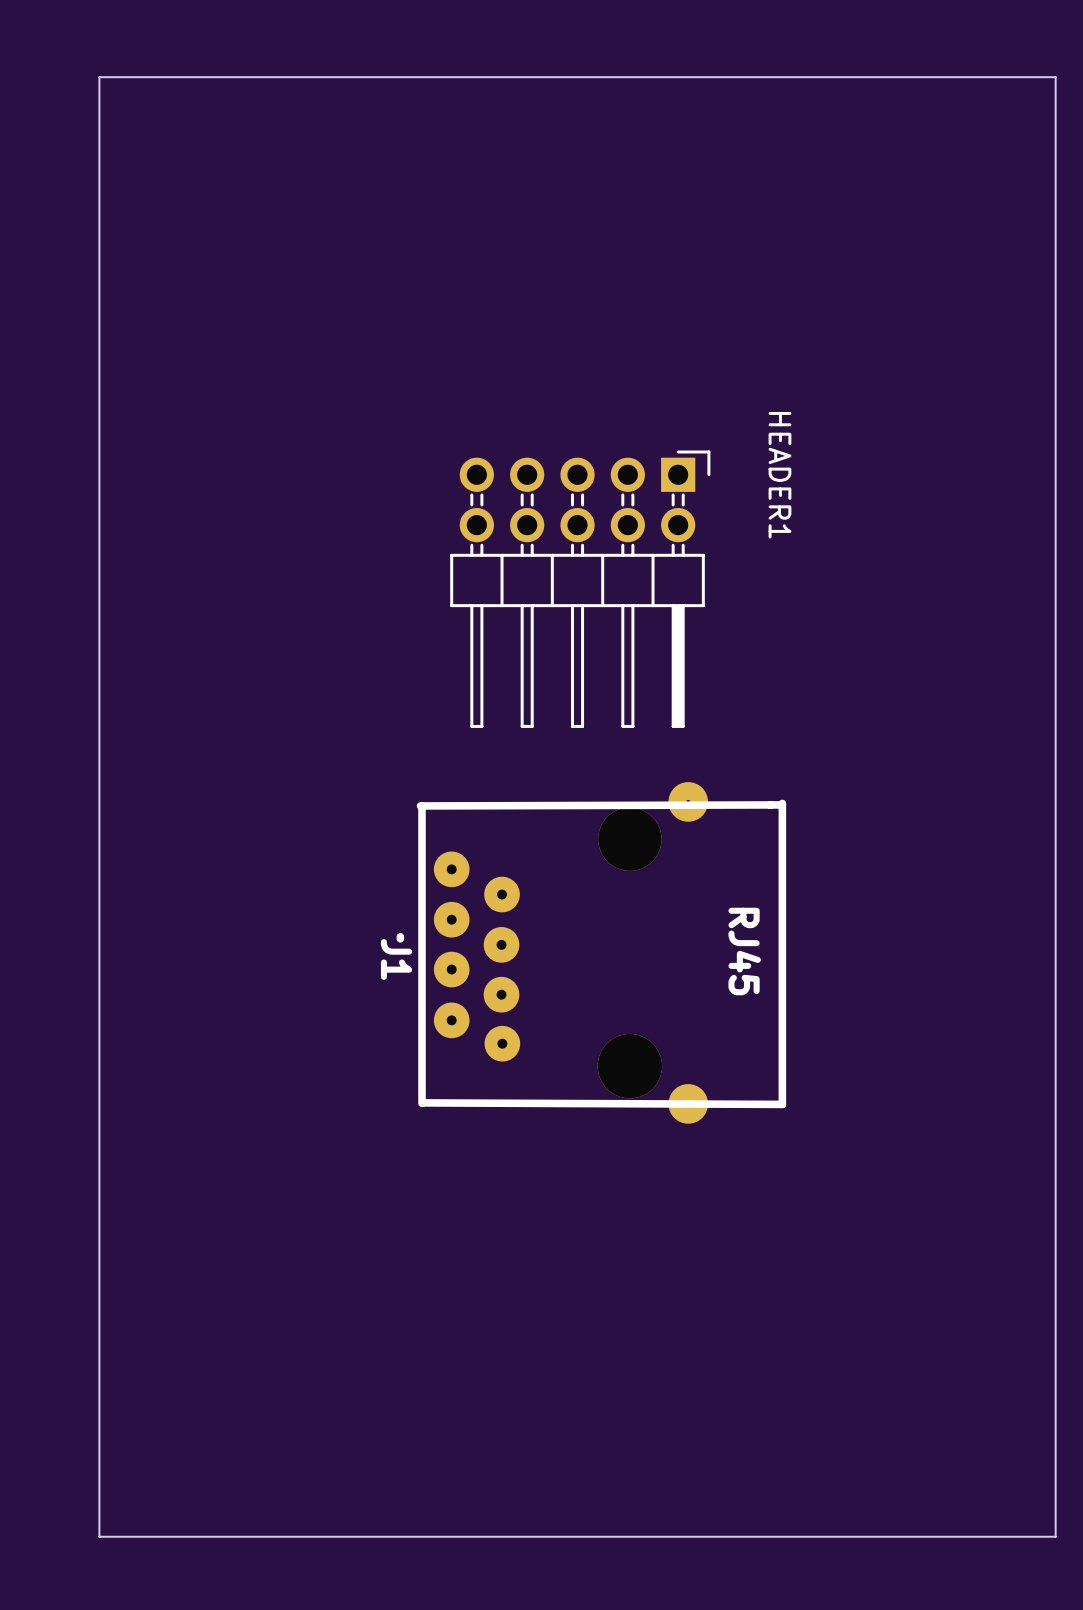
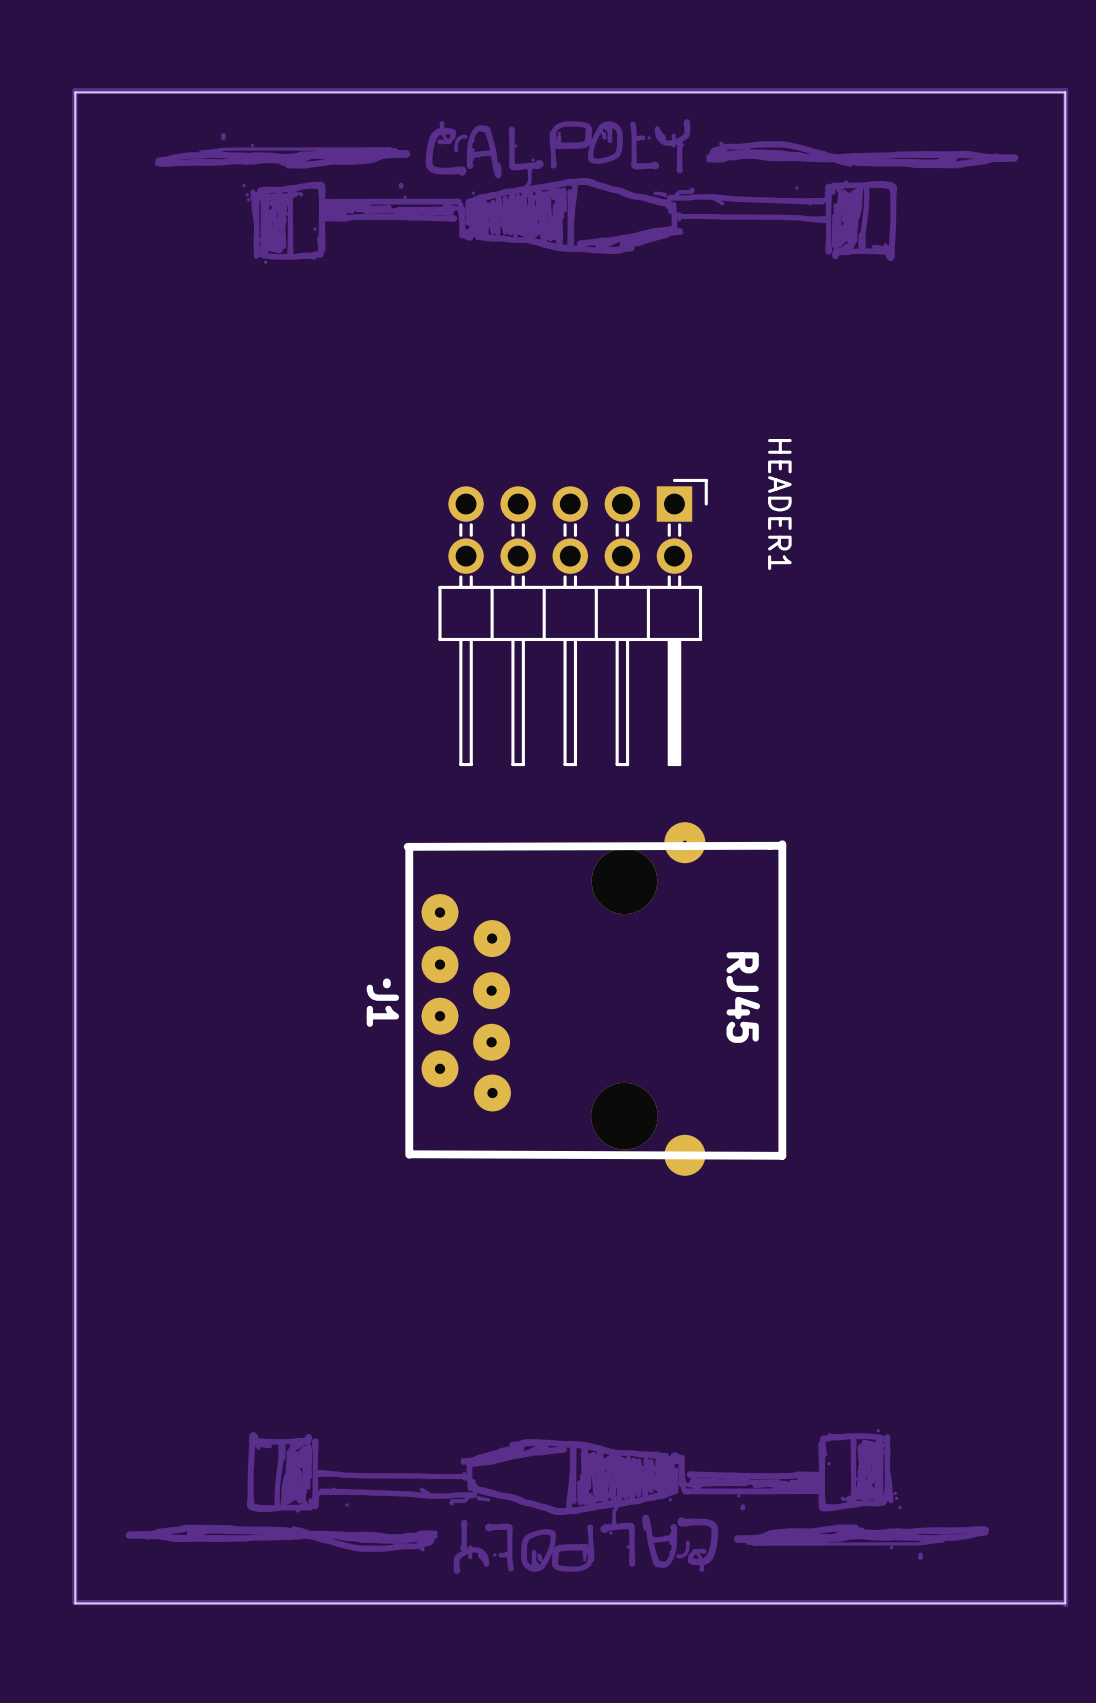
track: none -> (1065, 90) (74, 90) (74, 1602) (1063, 1602) (1065, 1604) (1065, 90)
drawing: none -> [154, 119, 1019, 264]
drawing: none -> [125, 1429, 990, 1574]

